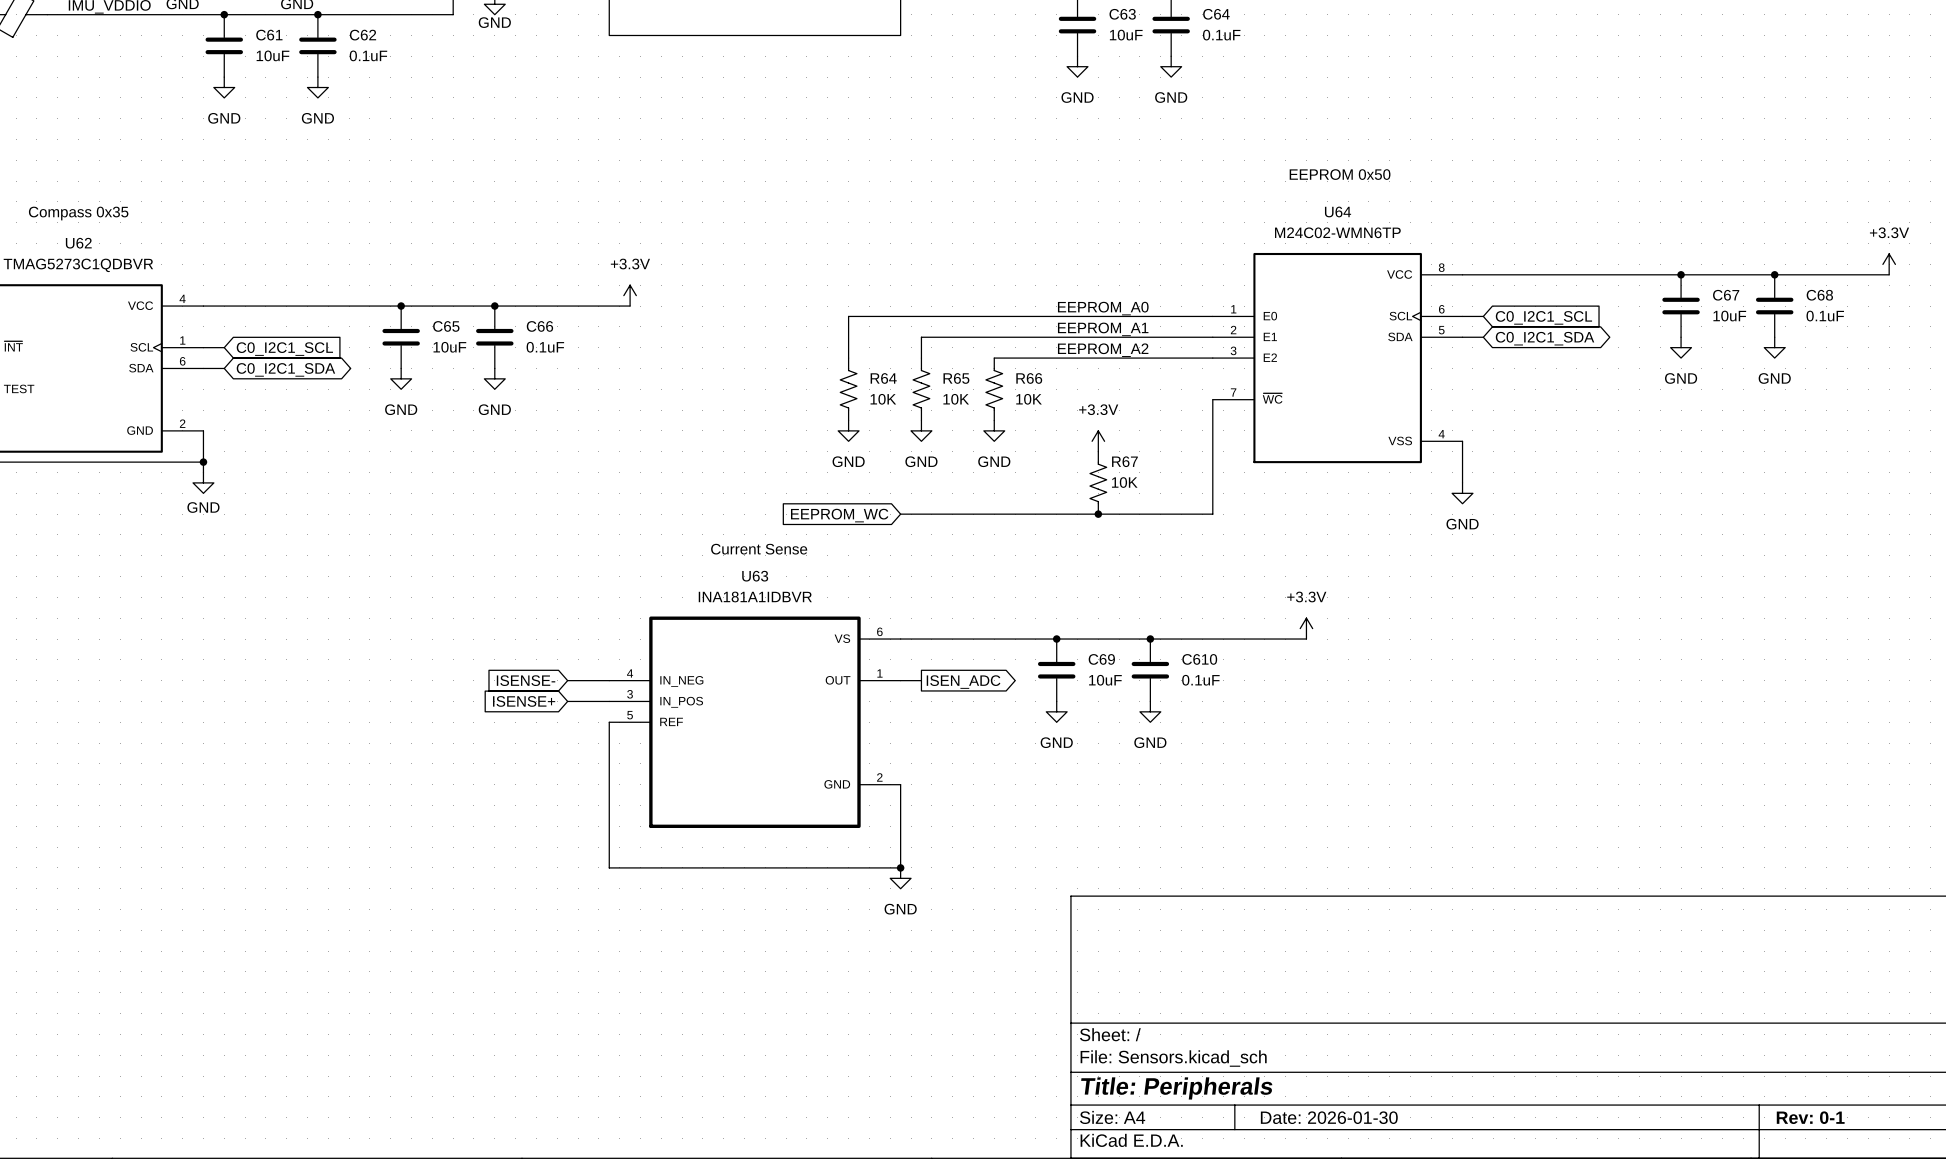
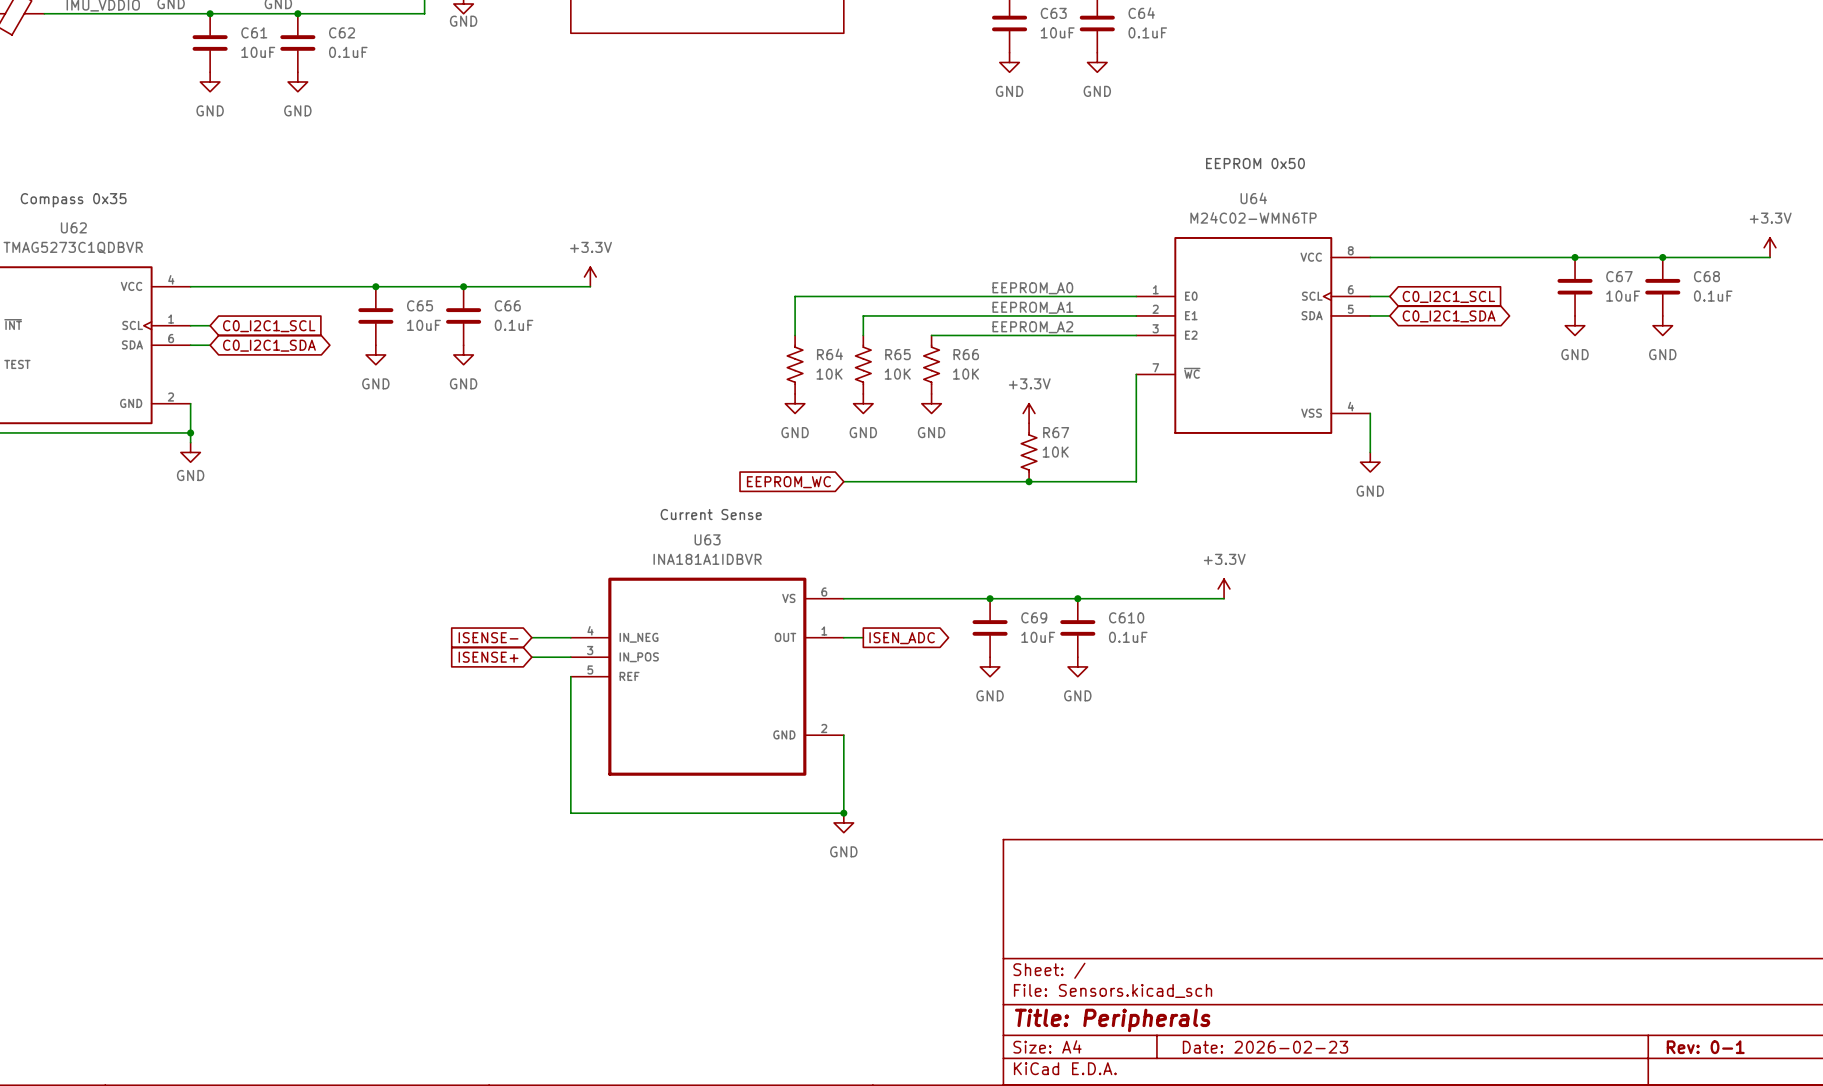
title block: Date: 2026-01-30 (1329, 1117) -> Date: 2026-02-23 (1265, 1047)

